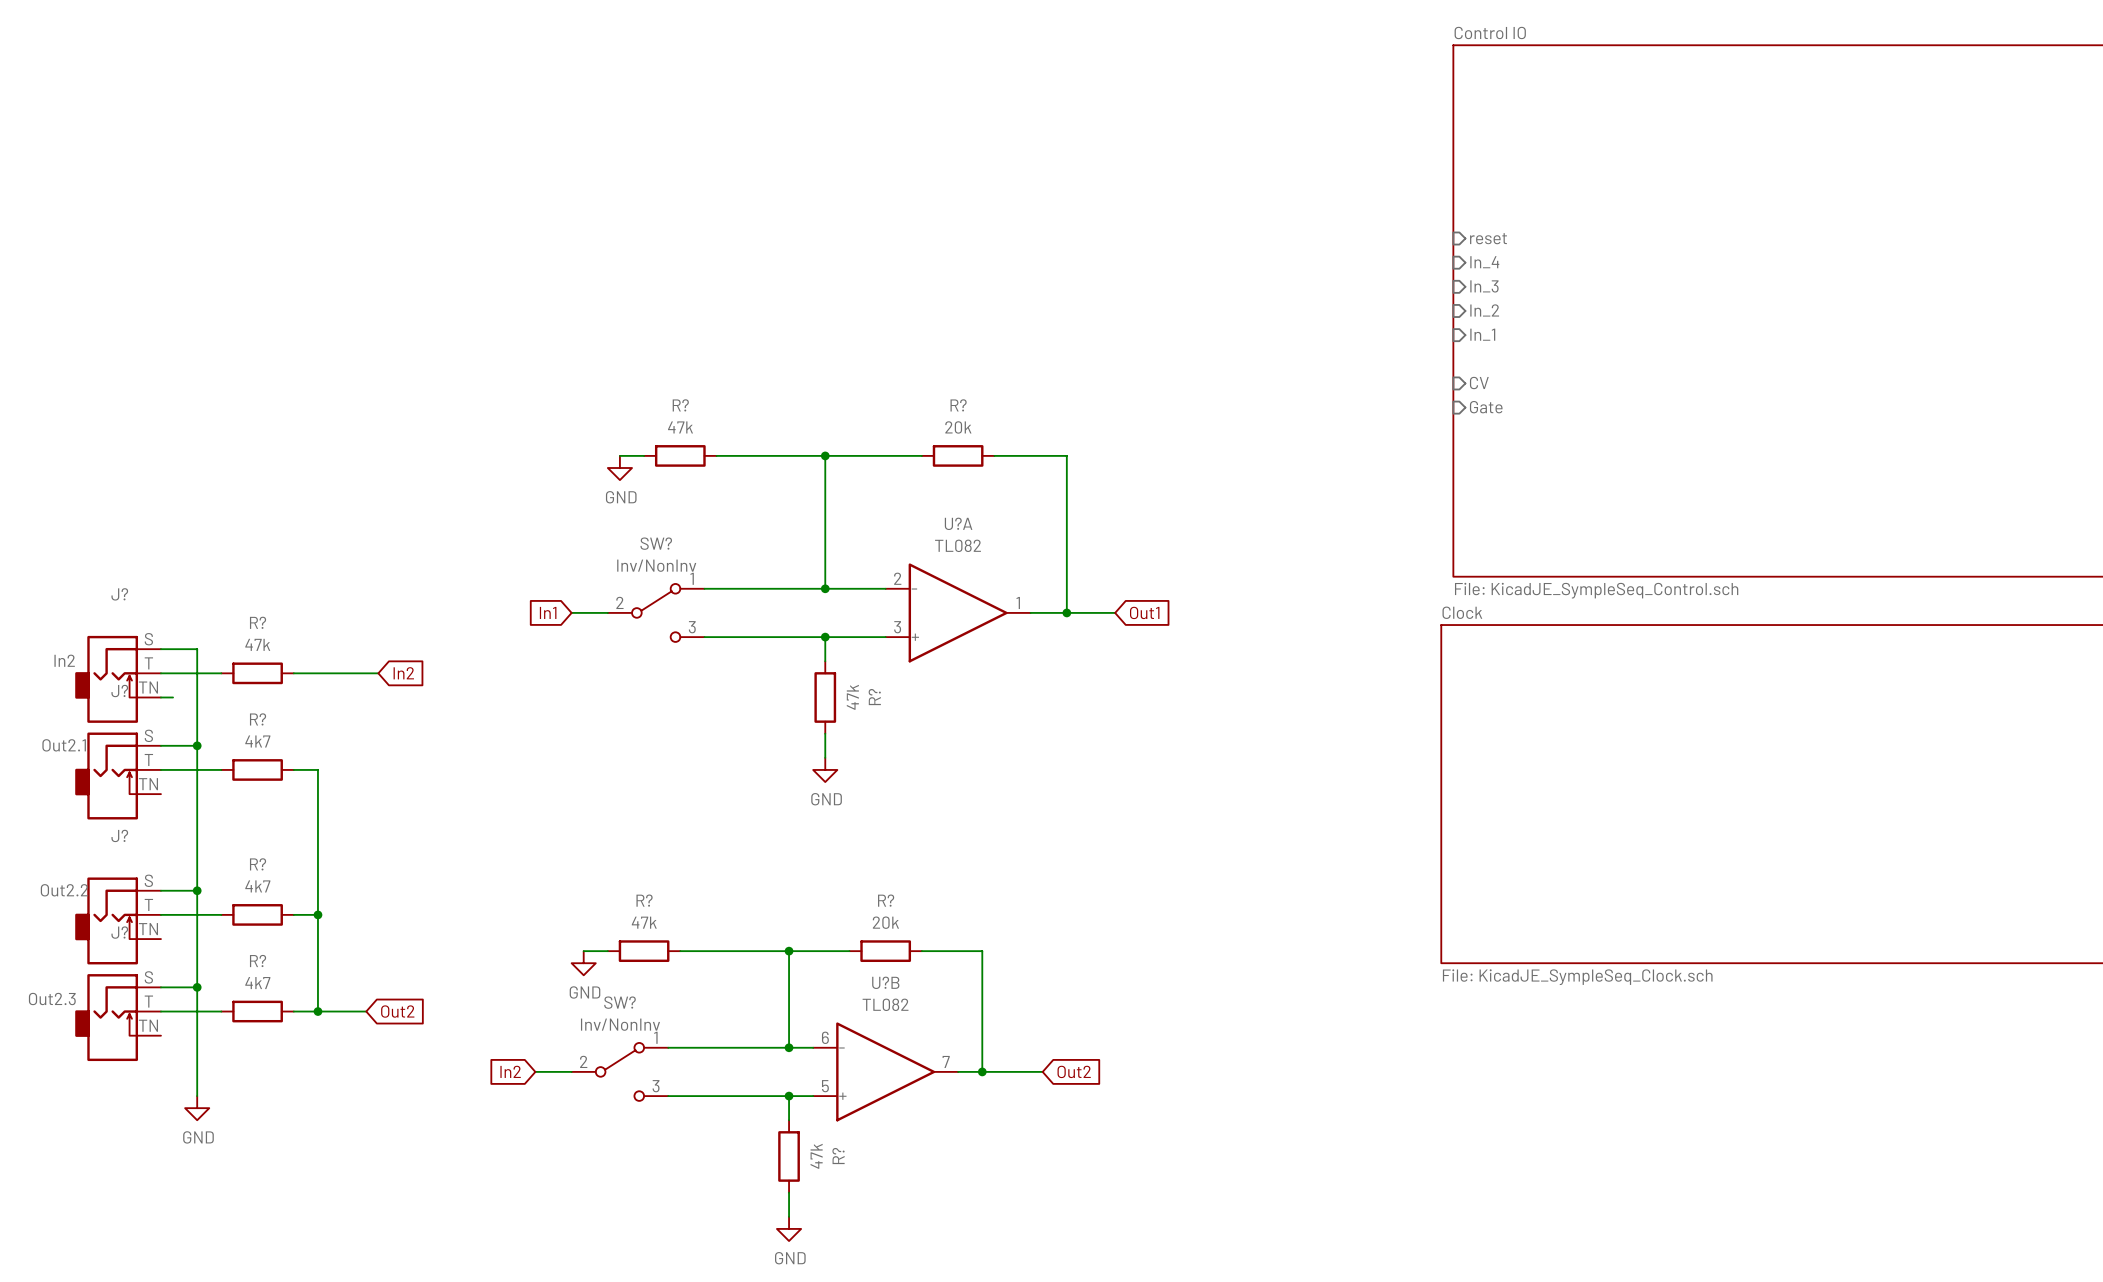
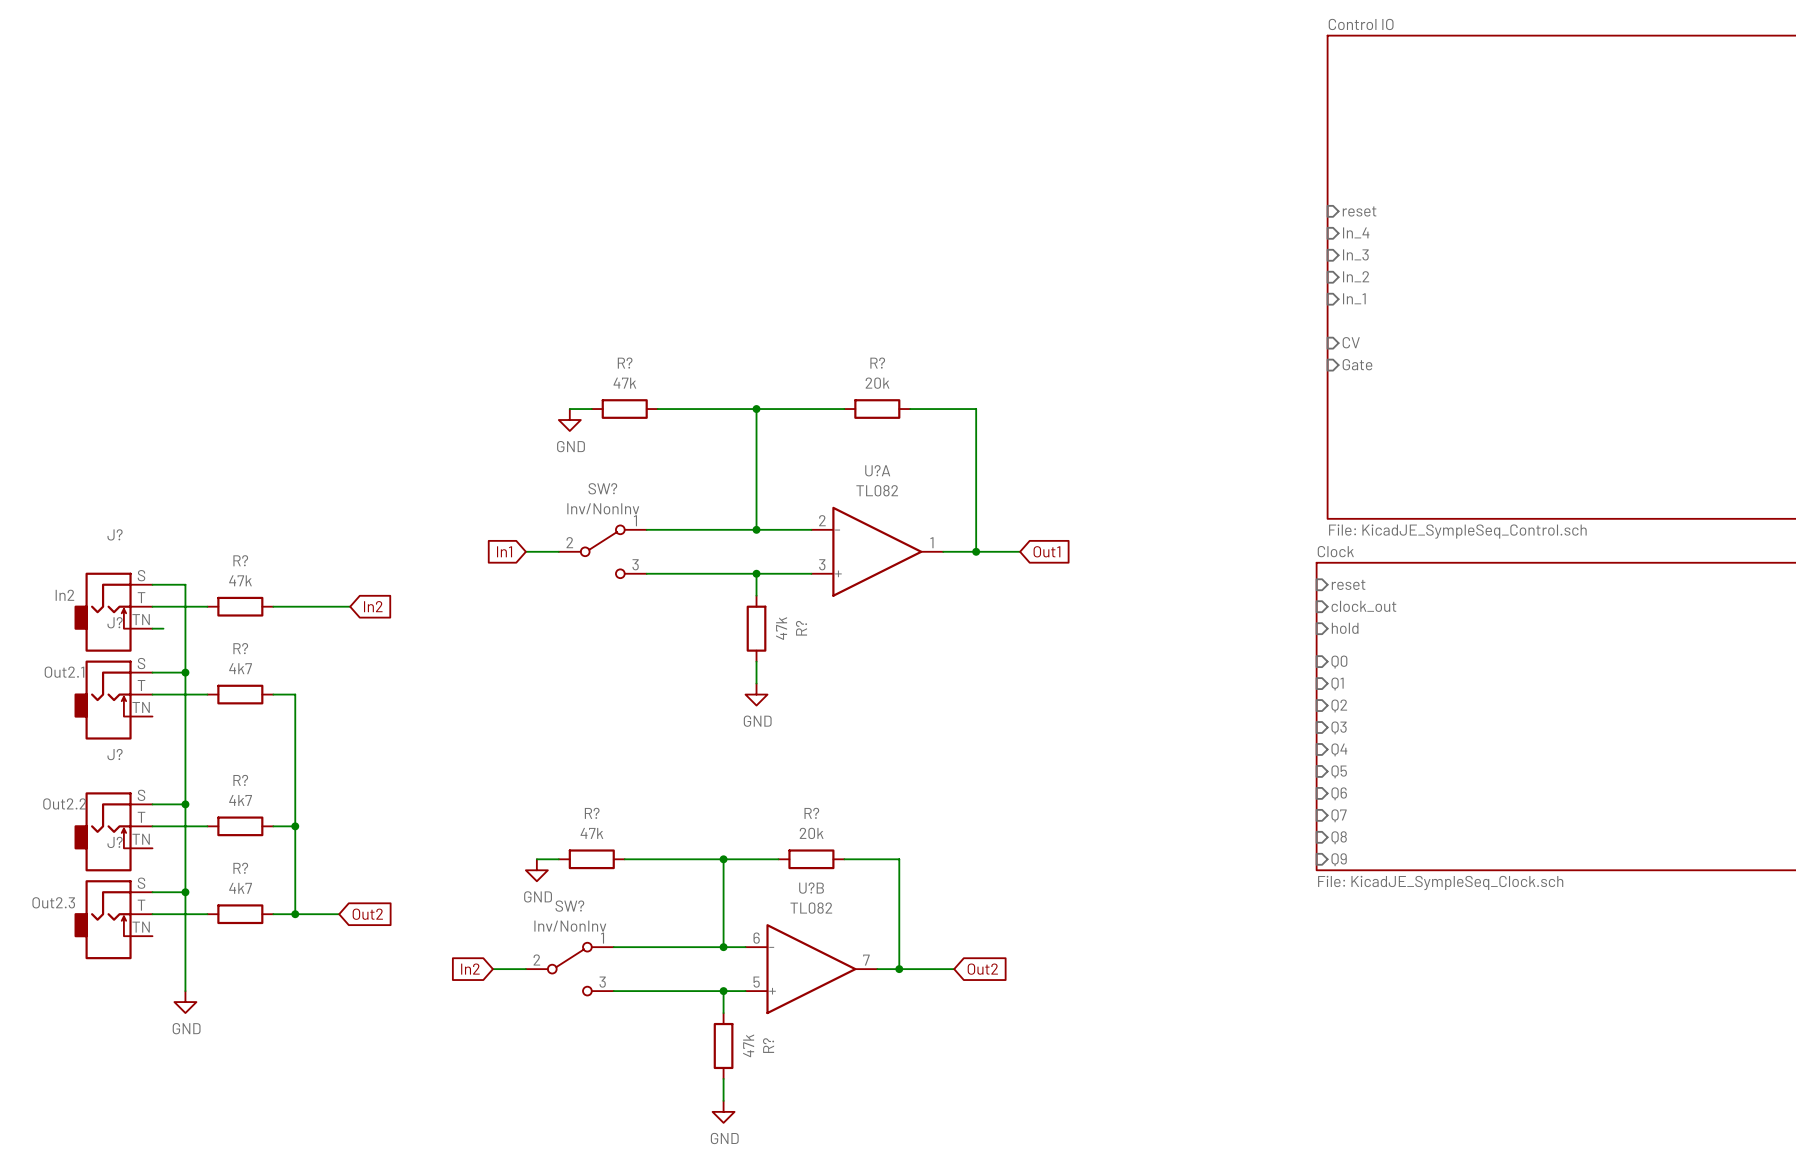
sheet pin: none -> reset (1348, 584)
sheet pin: none -> clock_out (1363, 606)
sheet pin: none -> hold (1345, 628)
sheet pin: none -> Q0 (1339, 662)
sheet pin: none -> Q1 (1337, 684)
sheet pin: none -> Q2 (1339, 705)
sheet pin: none -> Q3 (1339, 727)
sheet pin: none -> Q4 (1339, 749)
sheet pin: none -> Q5 (1339, 771)
sheet pin: none -> Q6 (1339, 793)
sheet pin: none -> Q7 (1339, 815)
sheet pin: none -> Q8 (1339, 837)
sheet pin: none -> Q9 (1339, 859)

